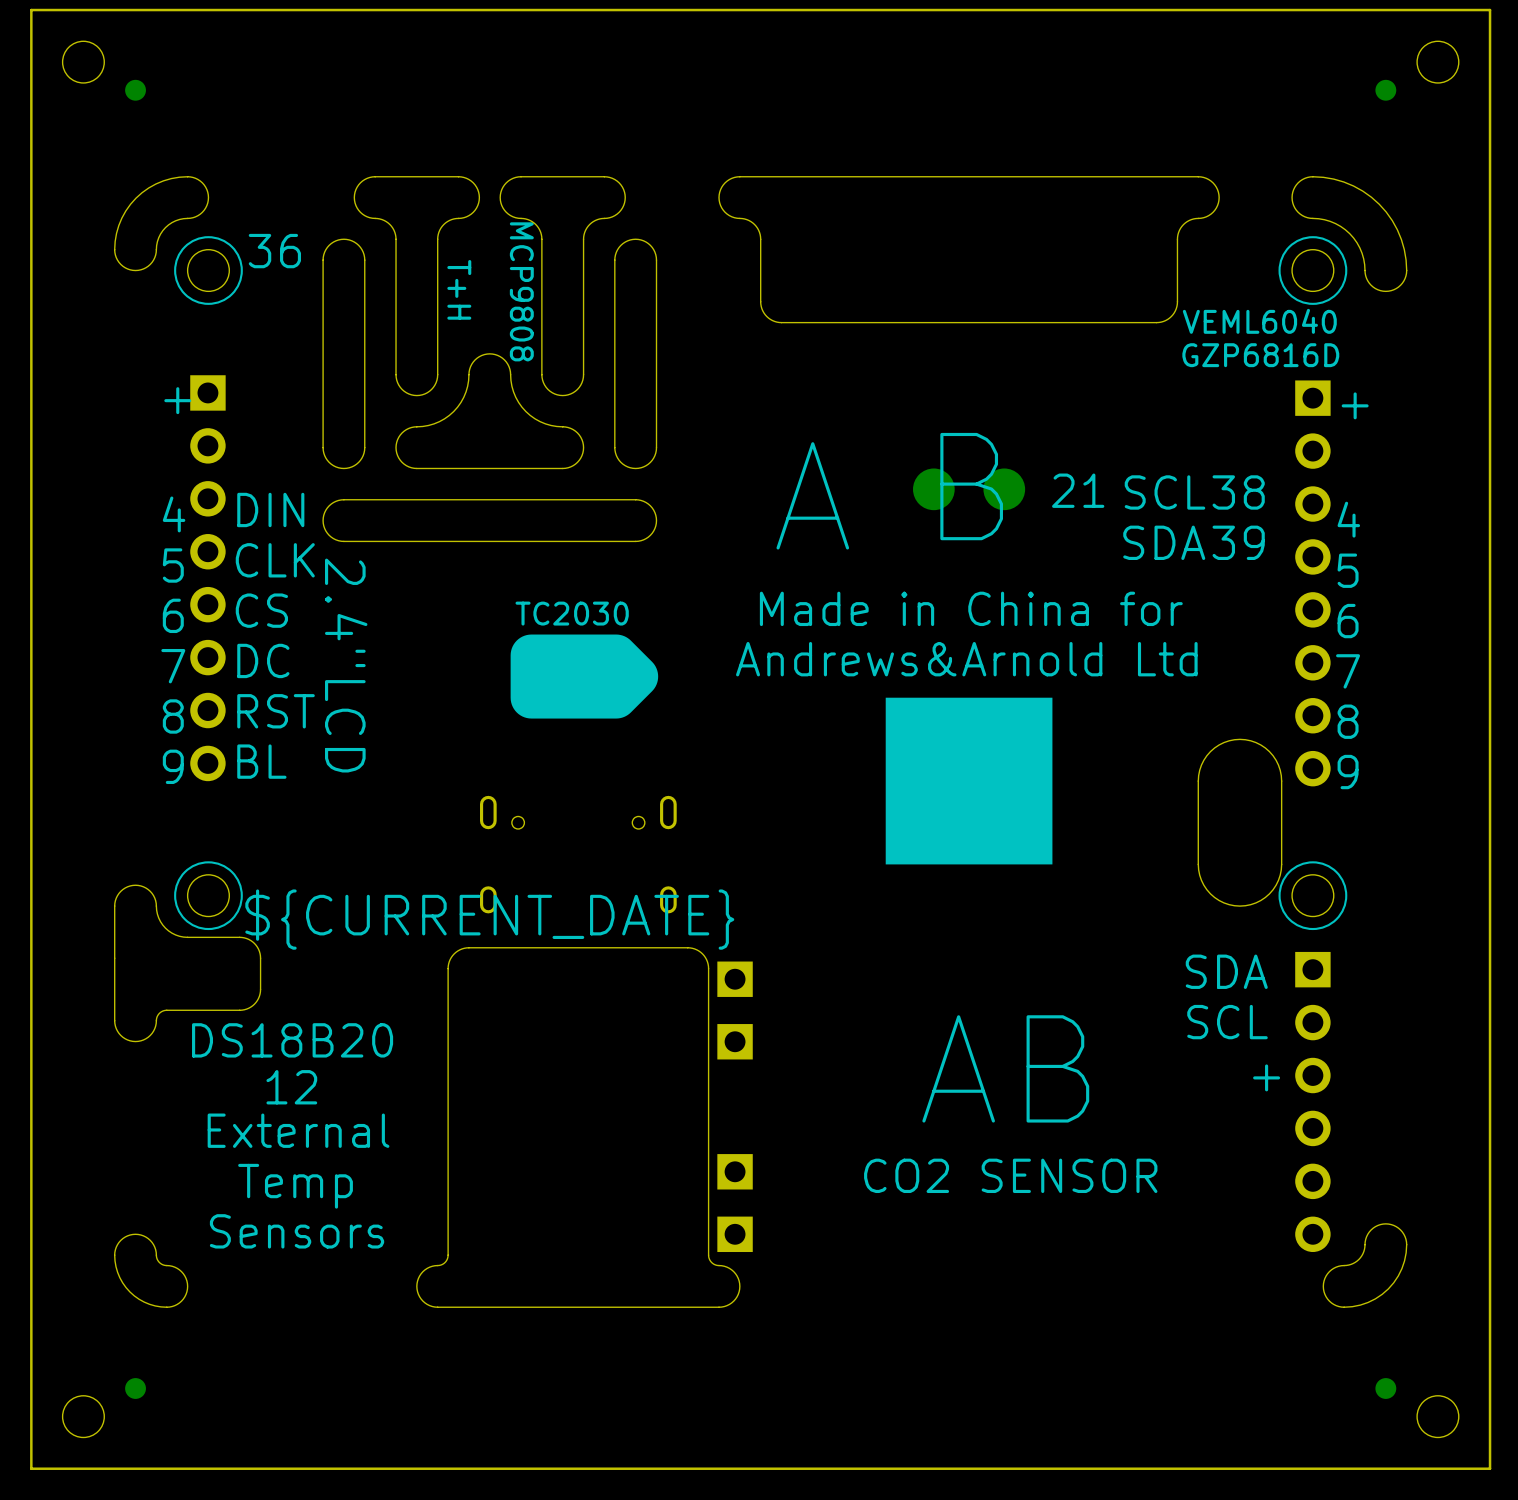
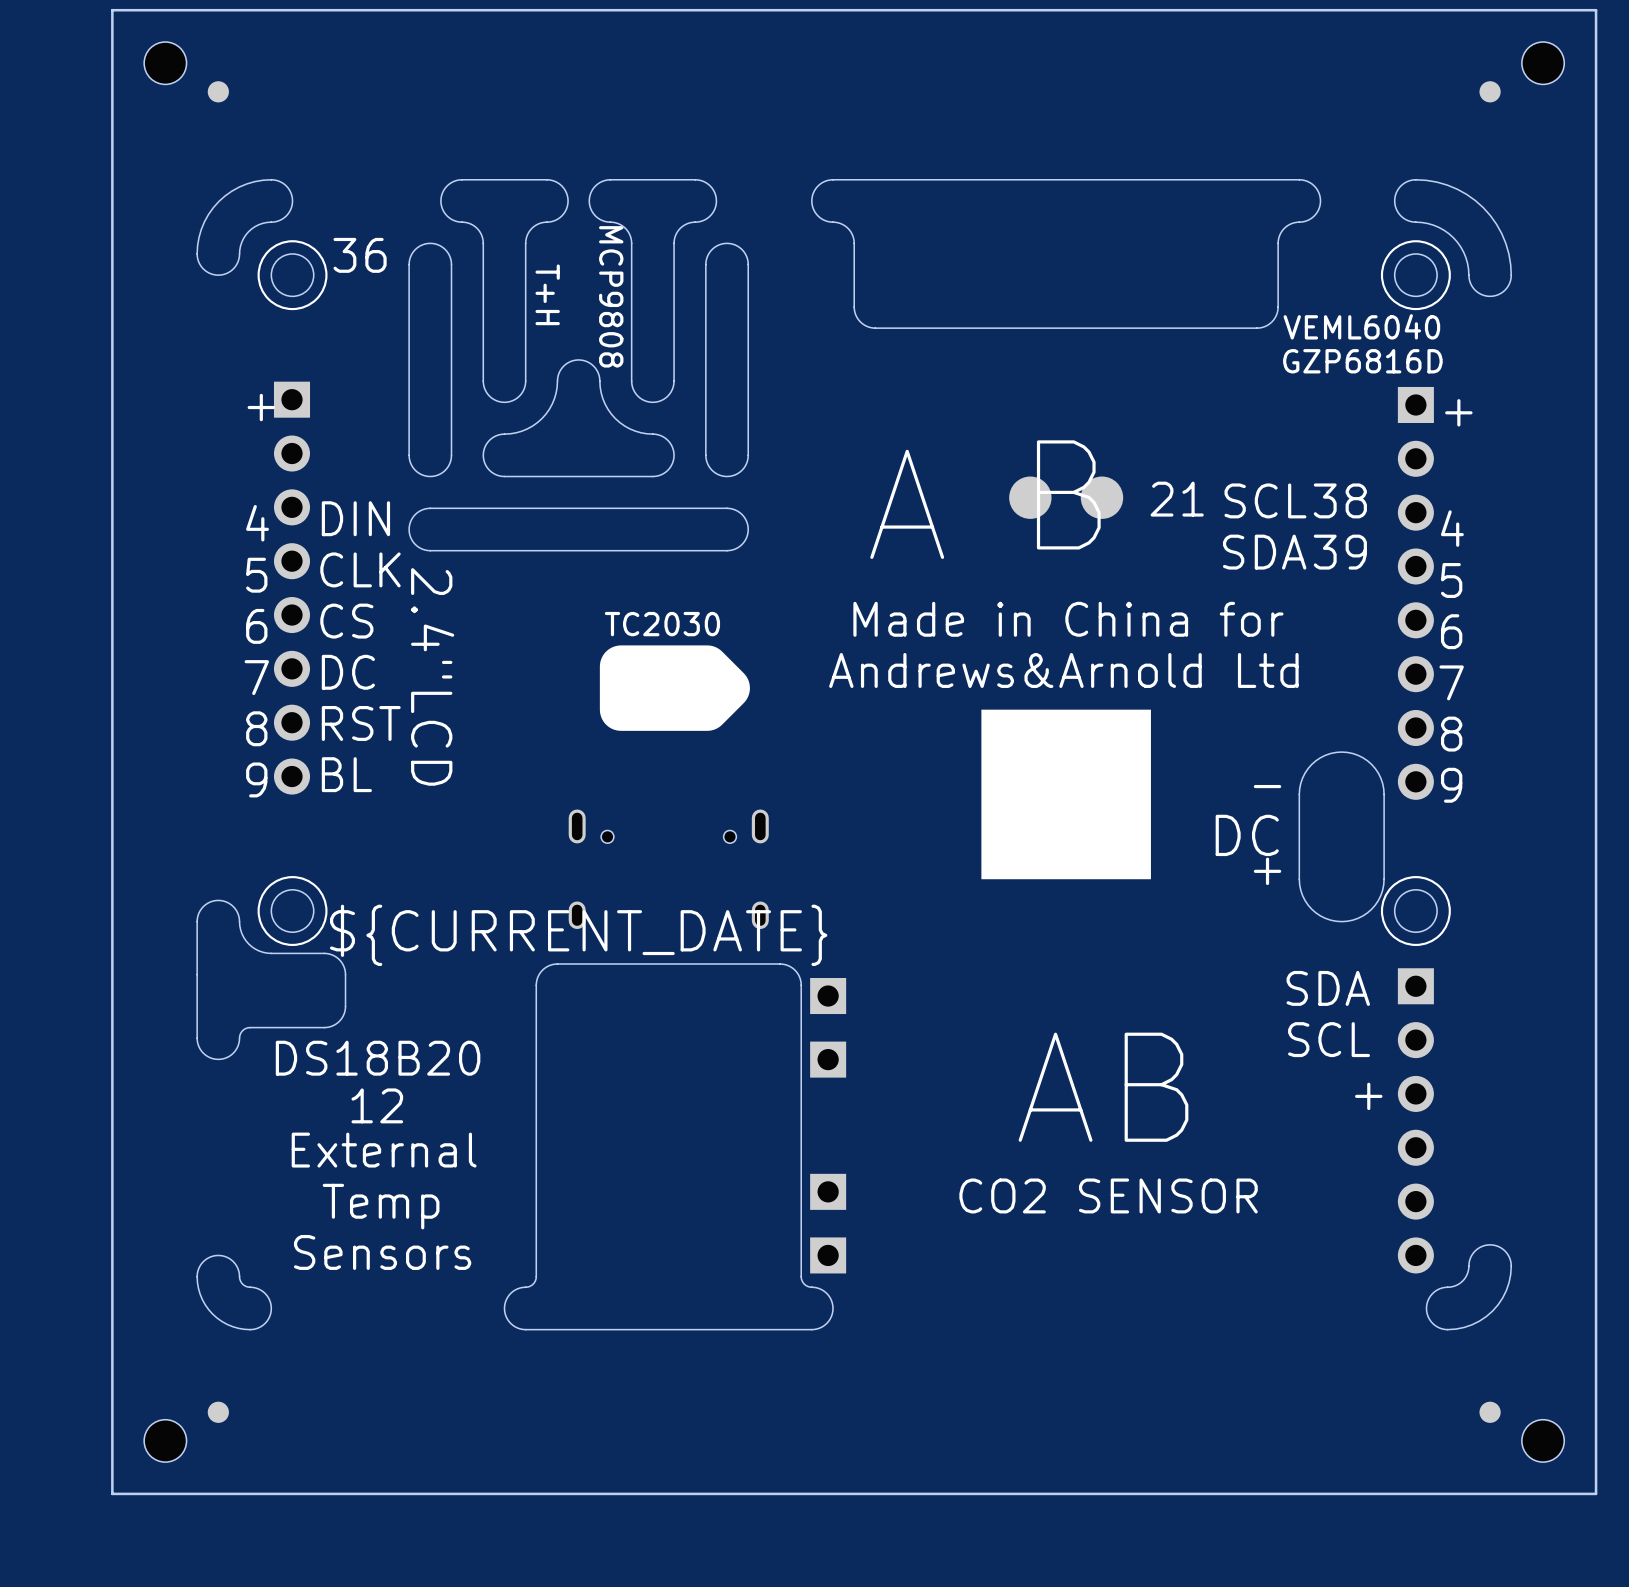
text: none -> - (1267, 786)
text: none -> DC (1247, 835)
text: none -> + (1267, 871)

